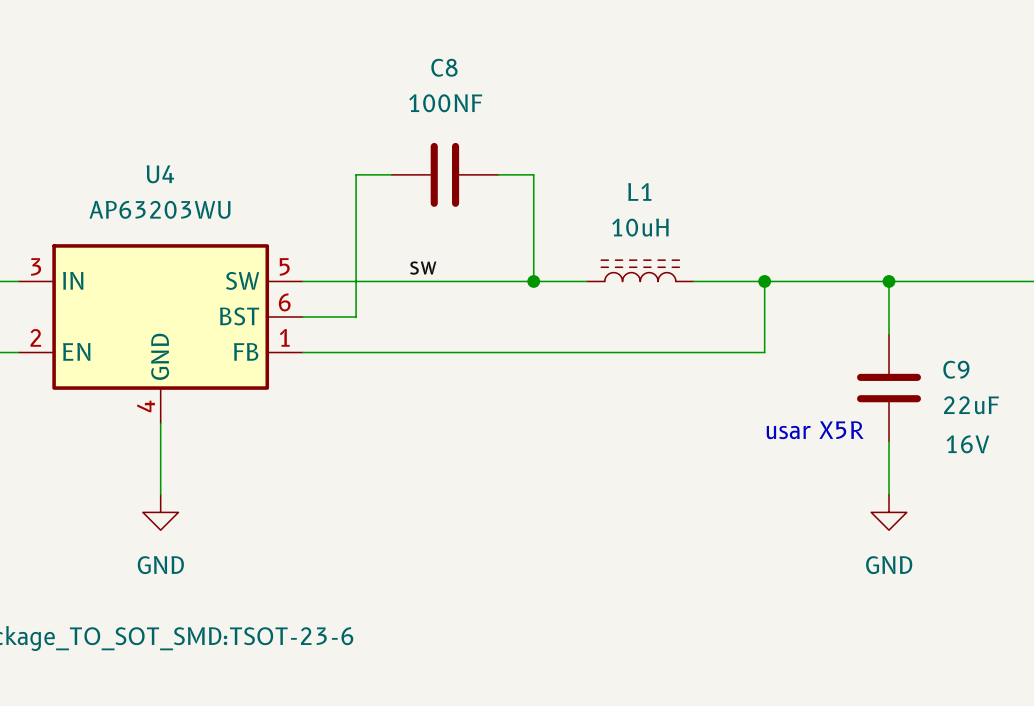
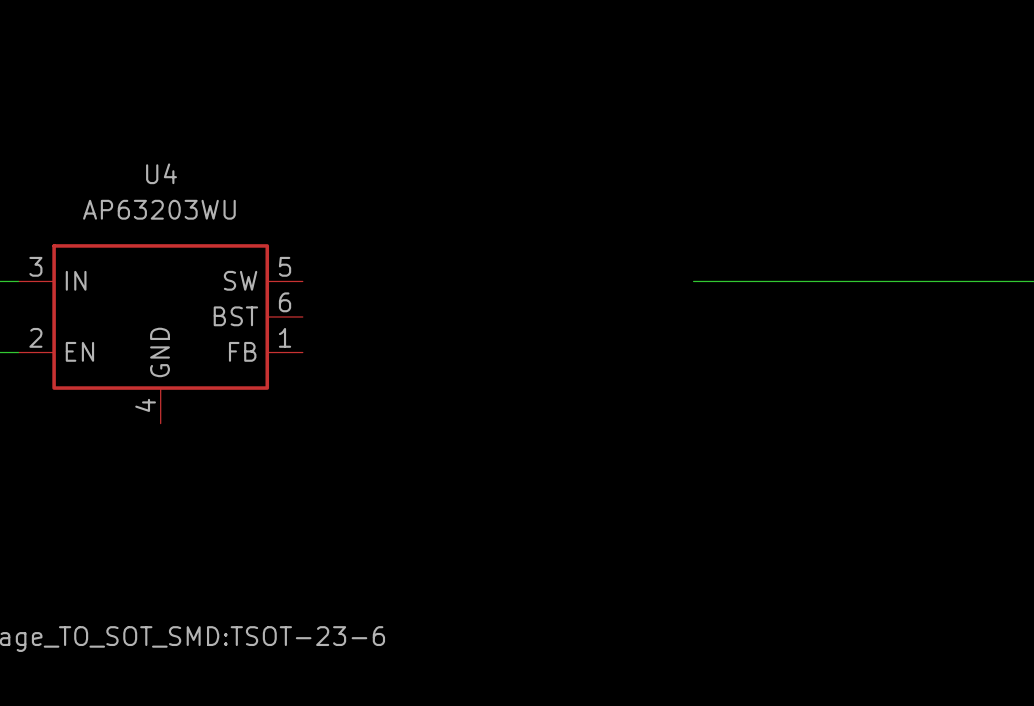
wire: (391, 174) (356, 174) (356, 316) (302, 316) -> none
C8: 100NF (444, 174) -> none
wire: (498, 174) (533, 174) (533, 281) -> none
label: sw (423, 268) -> none
L1: 10uH (640, 270) -> none
wire: (302, 281) (587, 281) -> none
junction: (533, 281) -> none
wire: (764, 281) (764, 352) (302, 352) -> none
junction: (764, 281) -> none
wire: (889, 281) (889, 334) -> none
junction: (889, 281) -> none
C9: 22uF (889, 388) -> none
wire: (160, 423) (160, 494) -> none
text: usar X5R (815, 430) -> none
wire: (889, 441) (889, 494) -> none
power symbol: GND (160, 512) -> none
power symbol: GND (889, 512) -> none

